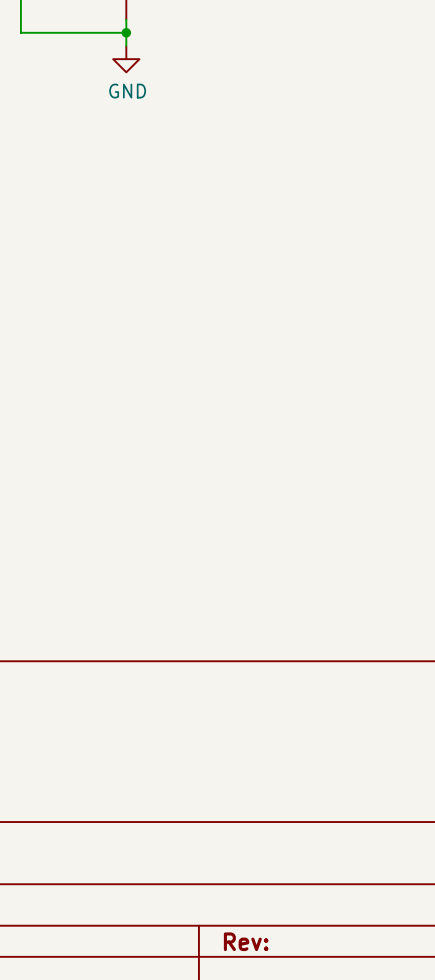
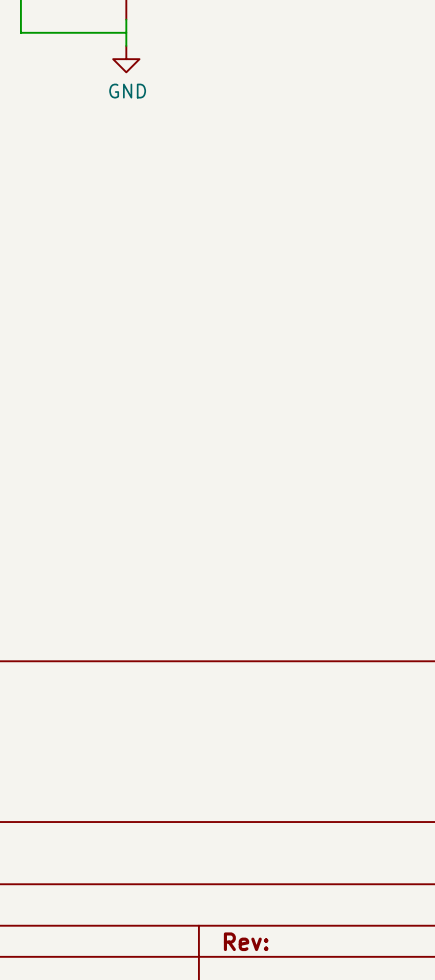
junction: (126, 32) -> none

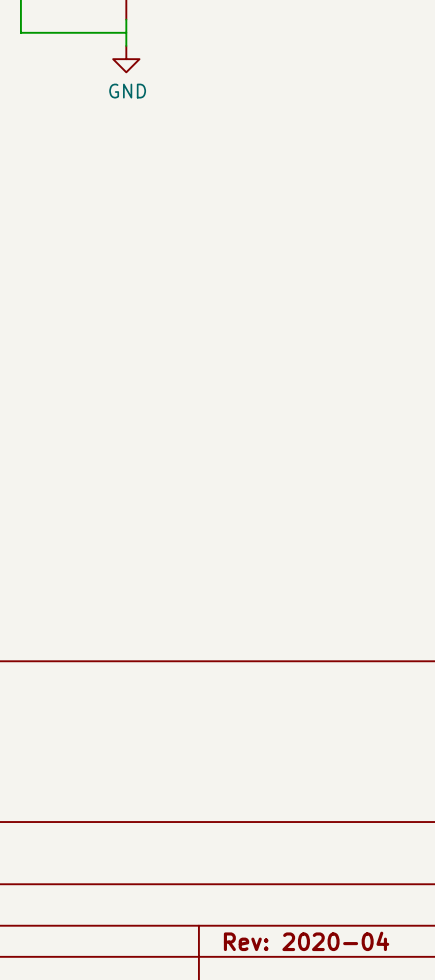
title block: Rev: (246, 941) -> Rev: 2020-04 (306, 941)

